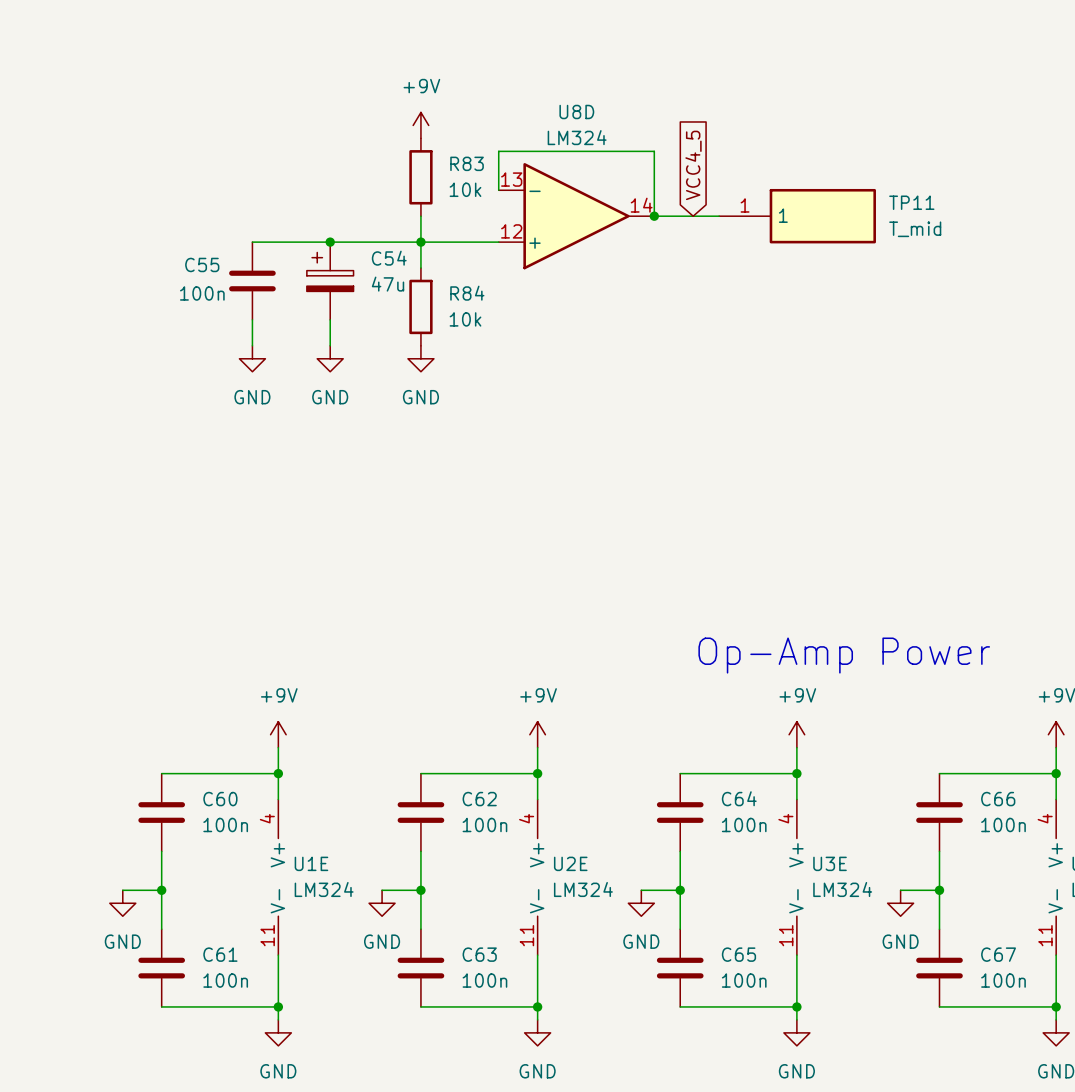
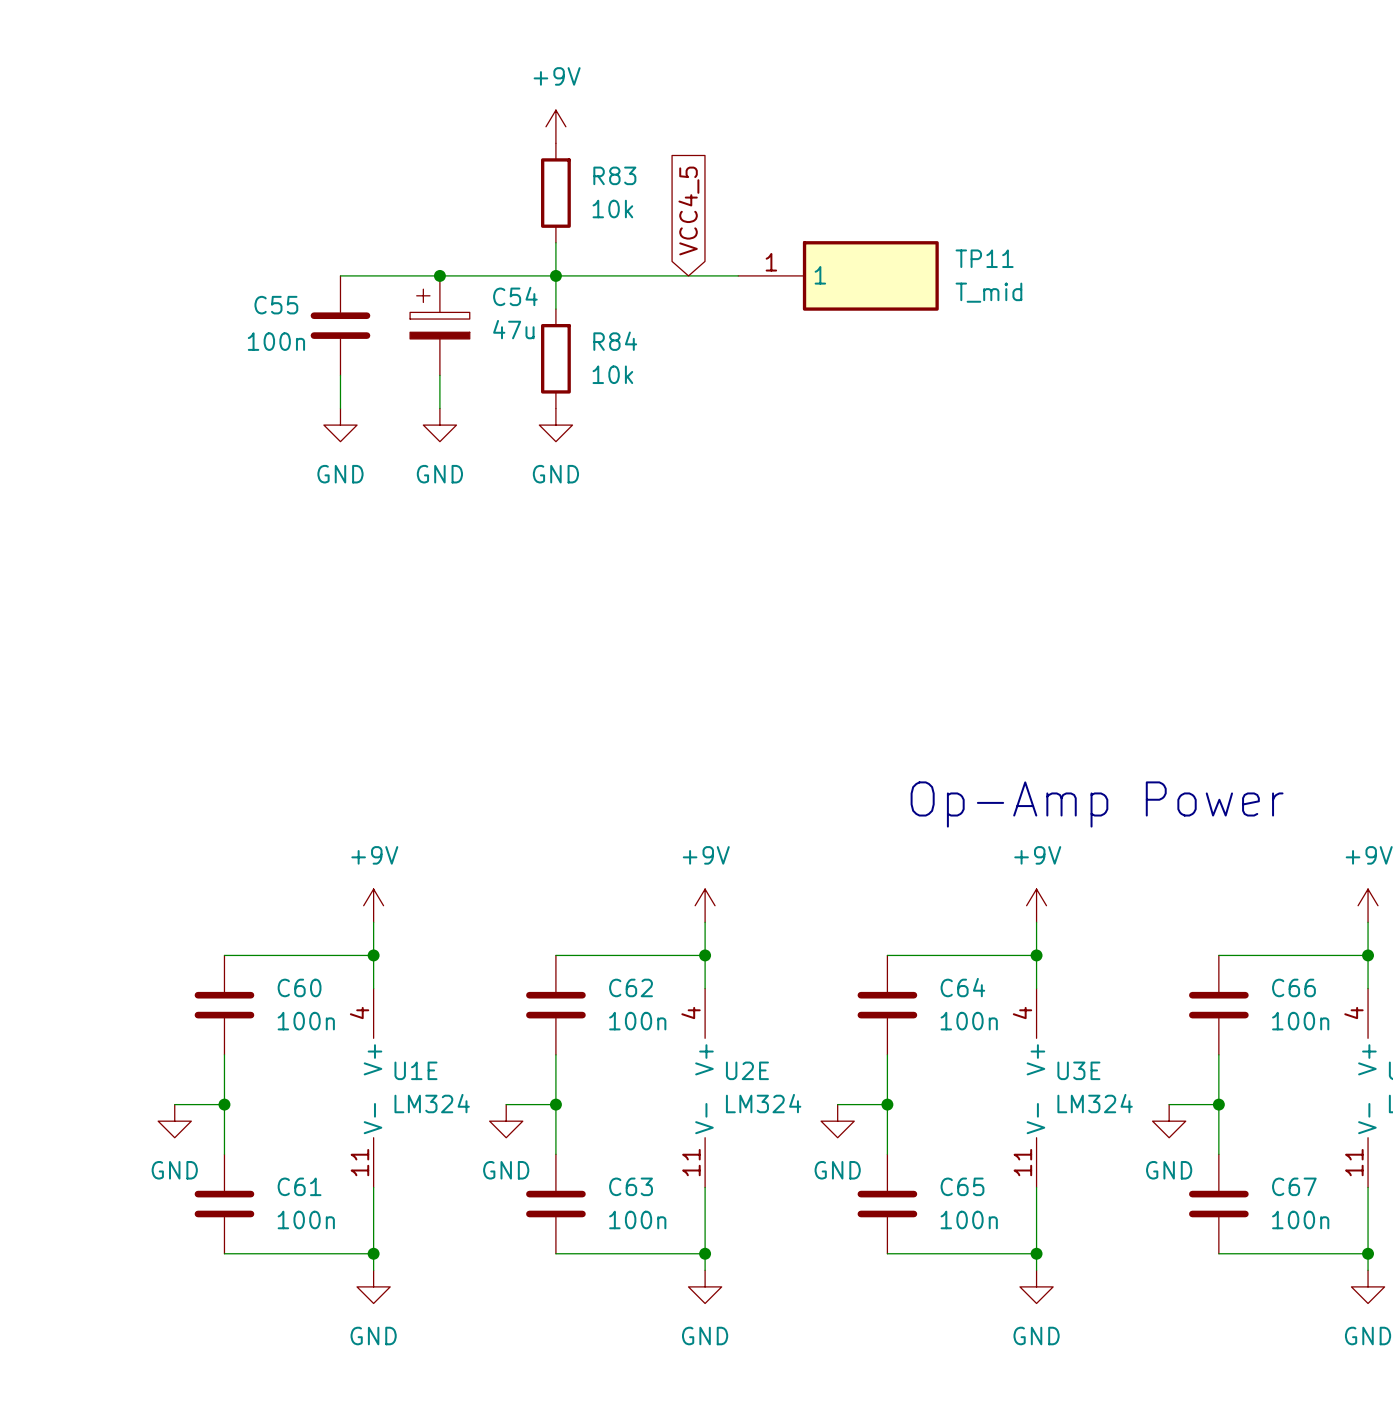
global label position: VCC4_5 (693, 165) -> VCC4_5 (688, 210)
wire: (498, 190) (498, 151) (654, 151) (654, 216) (719, 216) -> none
U8D: LM324 (576, 216) -> none
junction: (654, 216) -> none
TP11 position: (797, 216) -> (838, 275)

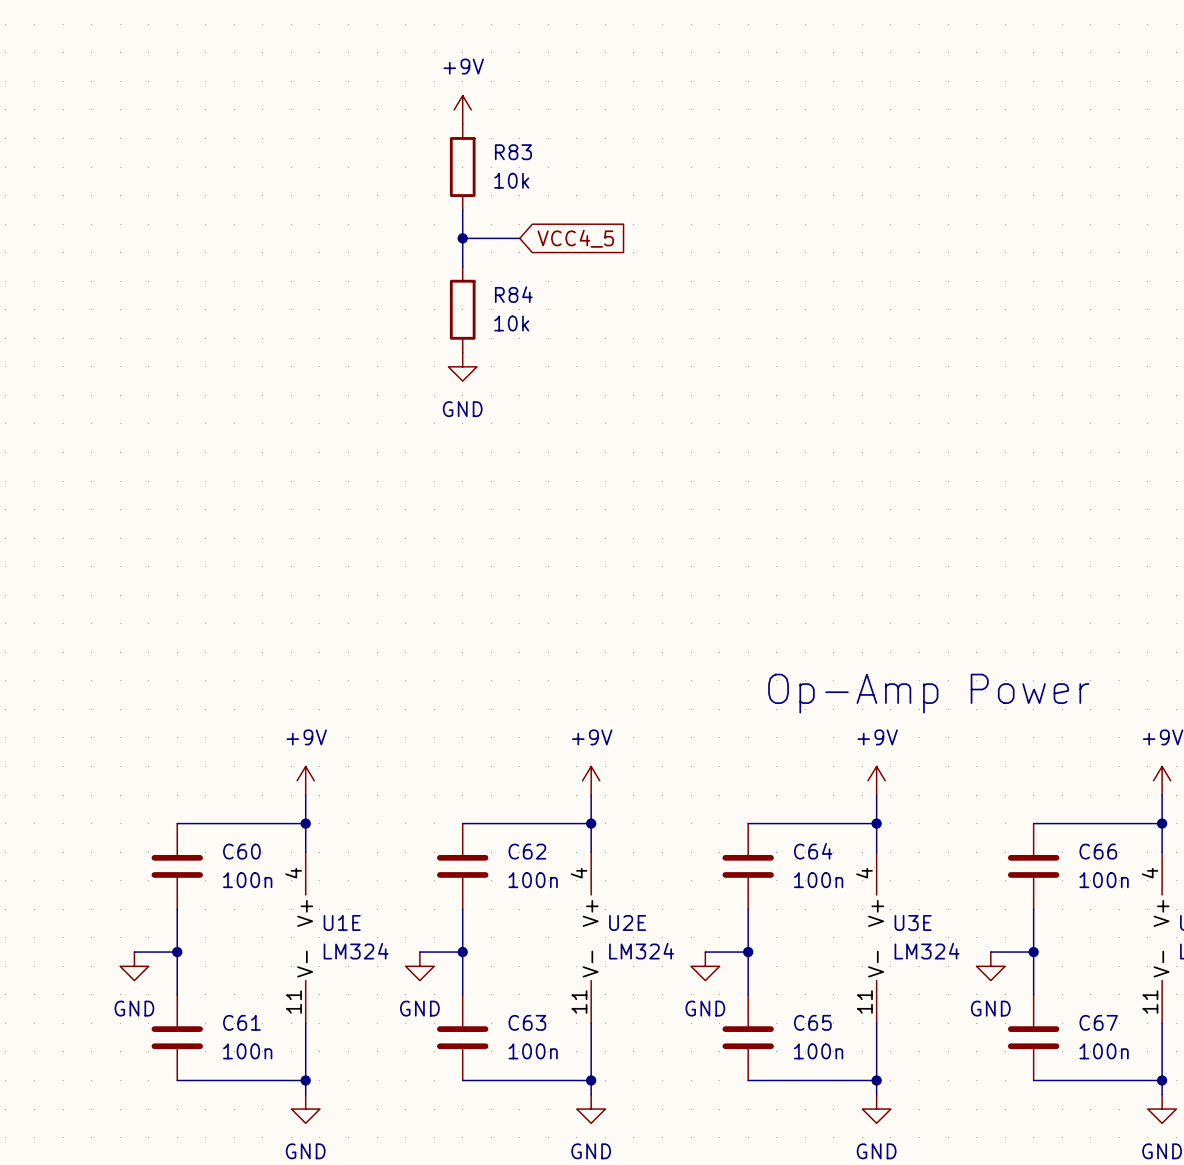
global label rotation: 0° (688, 210) -> 90° clockwise (575, 238)
wire: (340, 275) (555, 275) -> none
junction: (439, 275) -> none
wire: (622, 275) (738, 275) -> none
TP11: T_mid (838, 275) -> none
C55: 100n (340, 325) -> none
C54: 47u (439, 325) -> none
wire: (340, 375) (340, 408) -> none
wire: (439, 375) (439, 408) -> none
power symbol: GND (340, 425) -> none
power symbol: GND (439, 425) -> none

